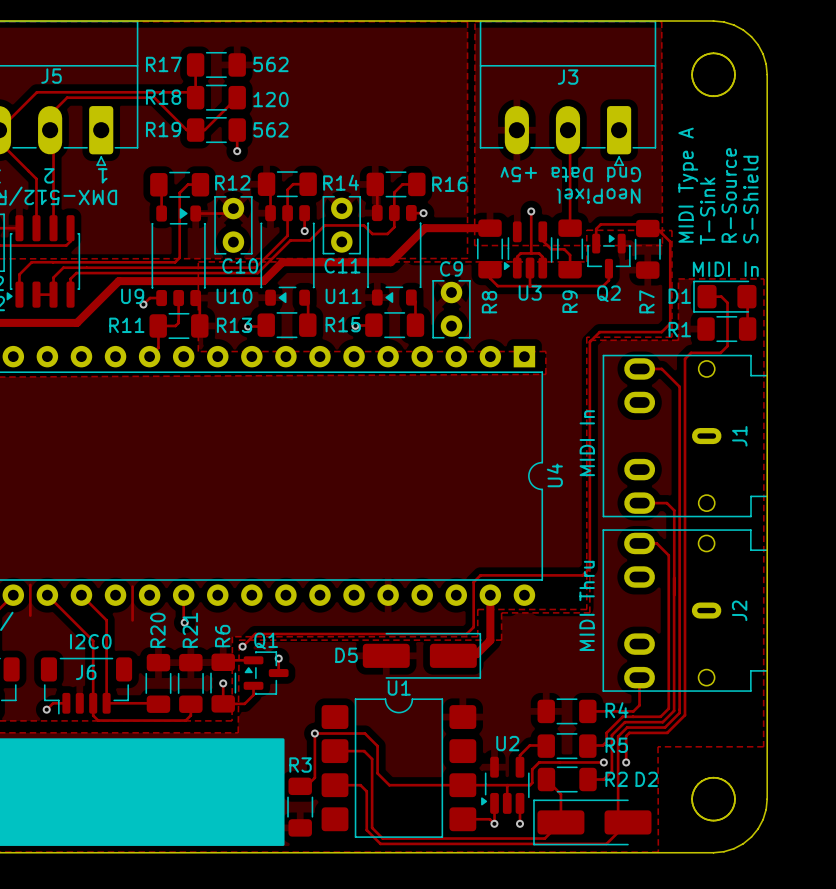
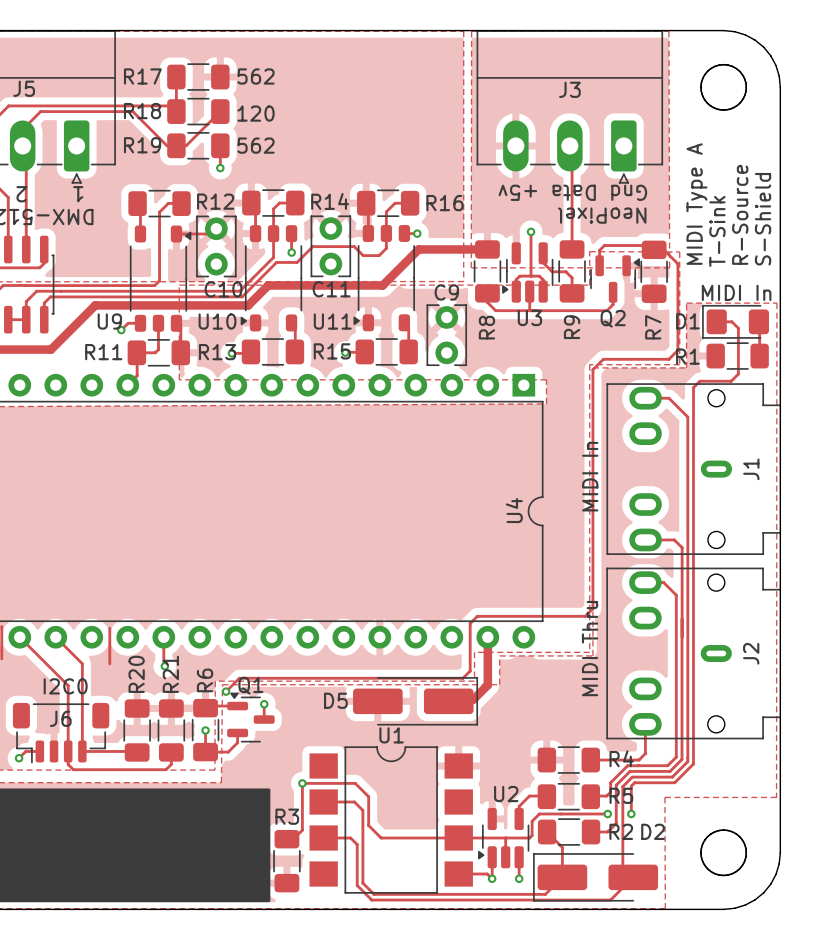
U11 footprint: [367, 204, 422, 306] -> [353, 224, 416, 332]
U9 footprint: [151, 205, 206, 307] -> [129, 225, 192, 332]
U10 footprint: [260, 205, 315, 306] -> [240, 225, 303, 332]
Q2 footprint: [587, 233, 631, 279] -> [590, 255, 641, 303]
U4 name position: U4 (554, 475) -> U4 (514, 510)
Q1 footprint: [243, 651, 289, 695] -> [227, 692, 275, 743]
U1 footprint: [321, 698, 477, 838] -> [309, 746, 473, 894]

